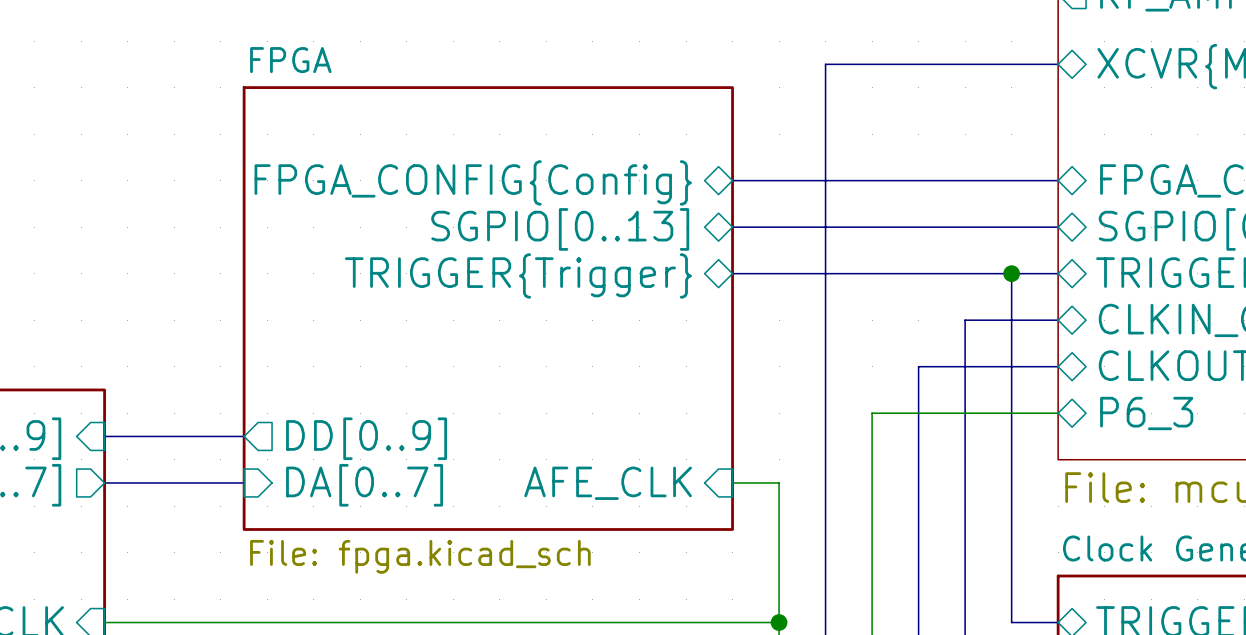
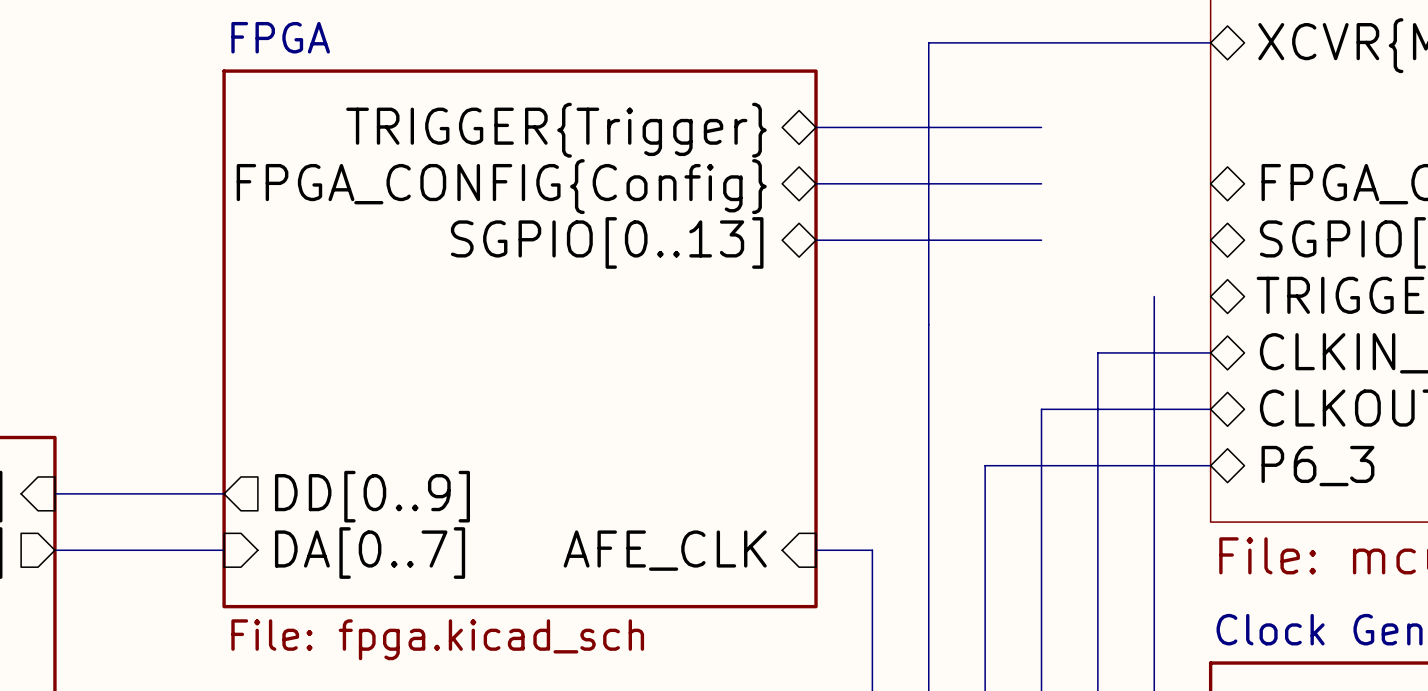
bus: none -> (816, 127) (1041, 127)
bus: (918, 180) (1058, 180) -> none
bus: (918, 227) (1058, 227) -> none
bus: (732, 273) (1058, 273) -> none
junction: (1011, 273) -> none
sheet pin position: TRIGGER{Trigger} (518, 275) -> TRIGGER{Trigger} (556, 130)

